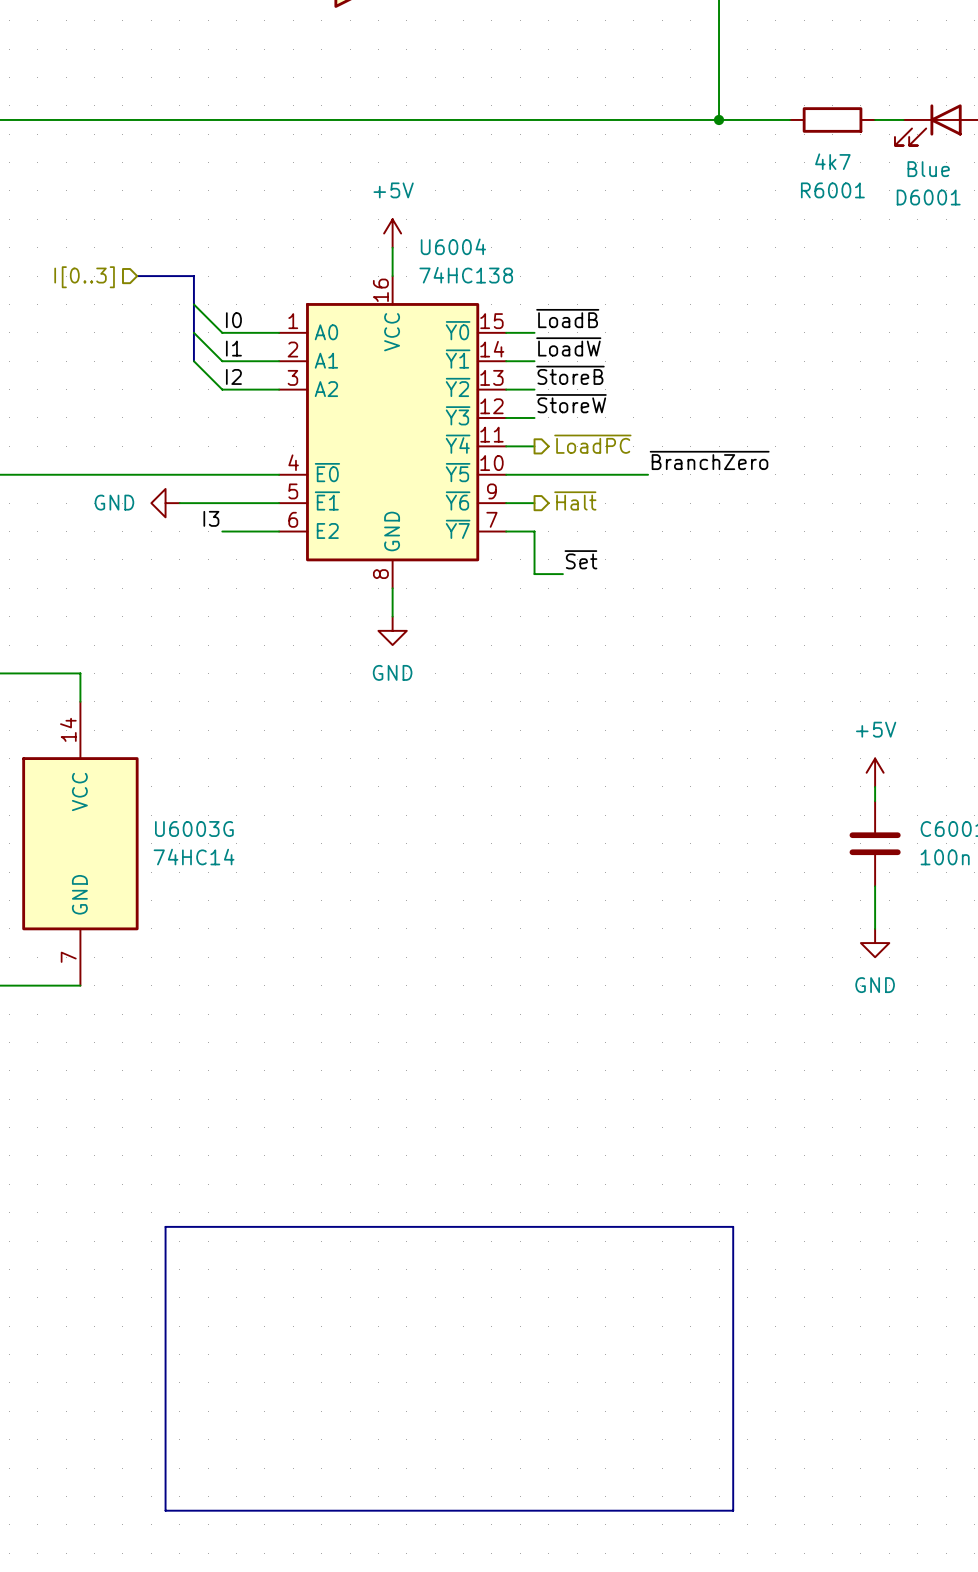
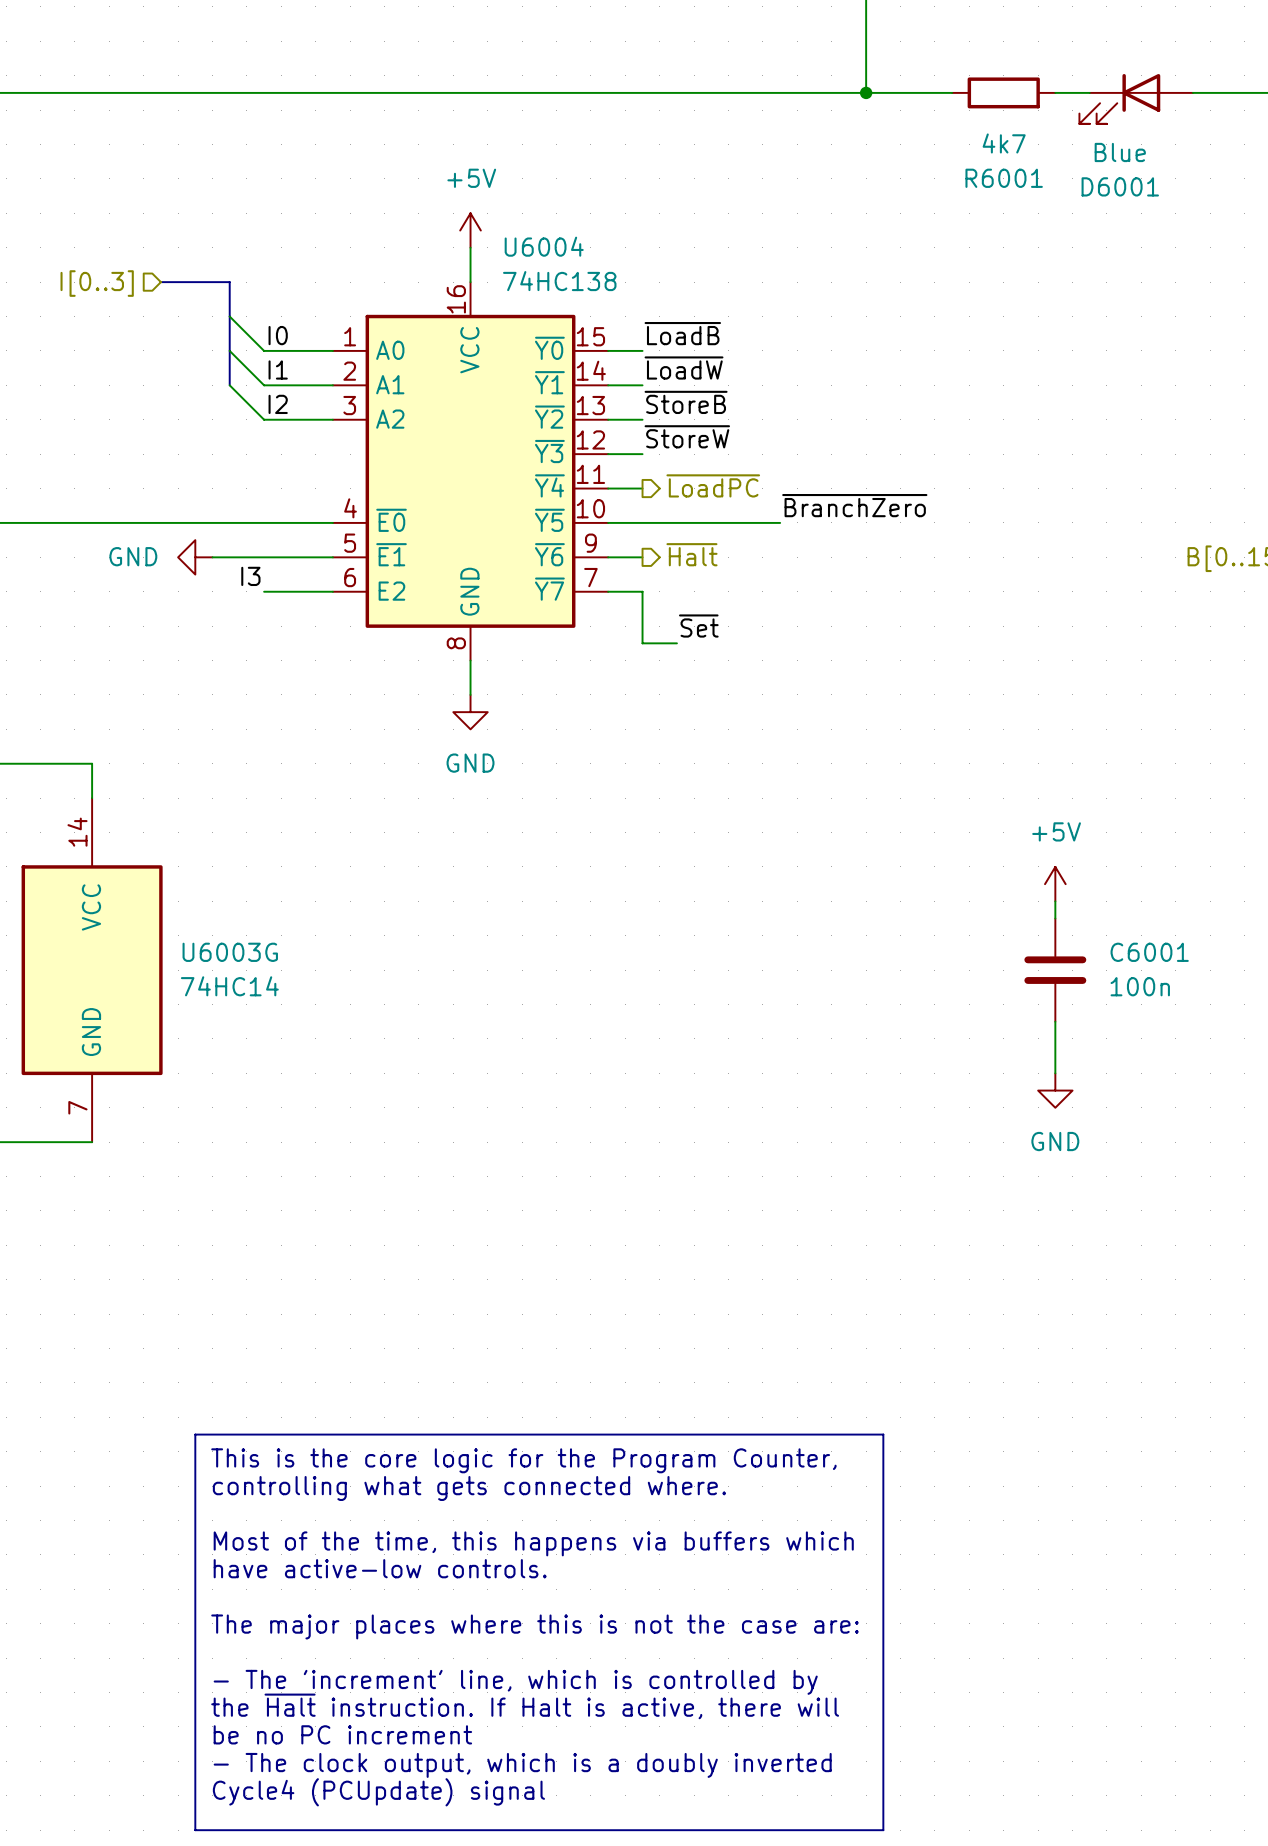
text: none -> This is the core logic for the Program Counter, (523, 1460)
text: none -> controlling what gets connected where. (469, 1488)
text: none -> Most of the time, this happens via buffers which (533, 1543)
text: none -> have active-low controls. (380, 1568)
text: none -> The major places where this is not the case are: (534, 1626)
text: none -> - The 'increment' line, which is controlled by (515, 1682)
text: none -> the ~{Halt} instruction. If Halt is active, there will (525, 1706)
text: none -> be no PC increment (342, 1734)
text: none -> - The clock output, which is a doubly inverted (522, 1765)
line: (165, 1510) (733, 1510) -> (195, 1778) (195, 1830) (883, 1830) (883, 1778)
text: none -> Cycle4 (PCUpdate) signal (378, 1792)

